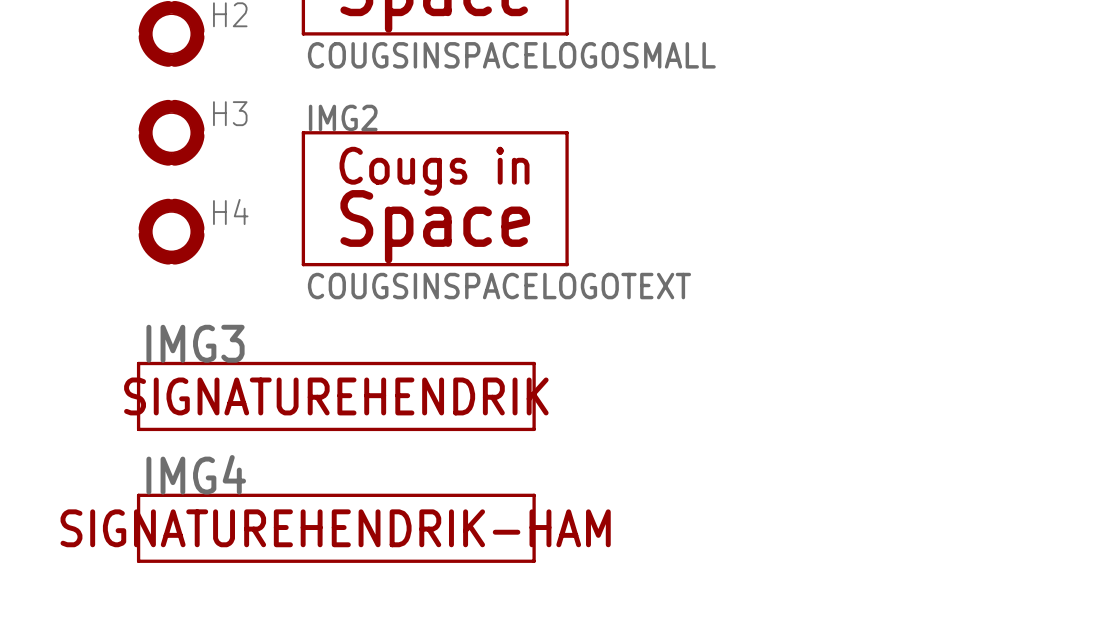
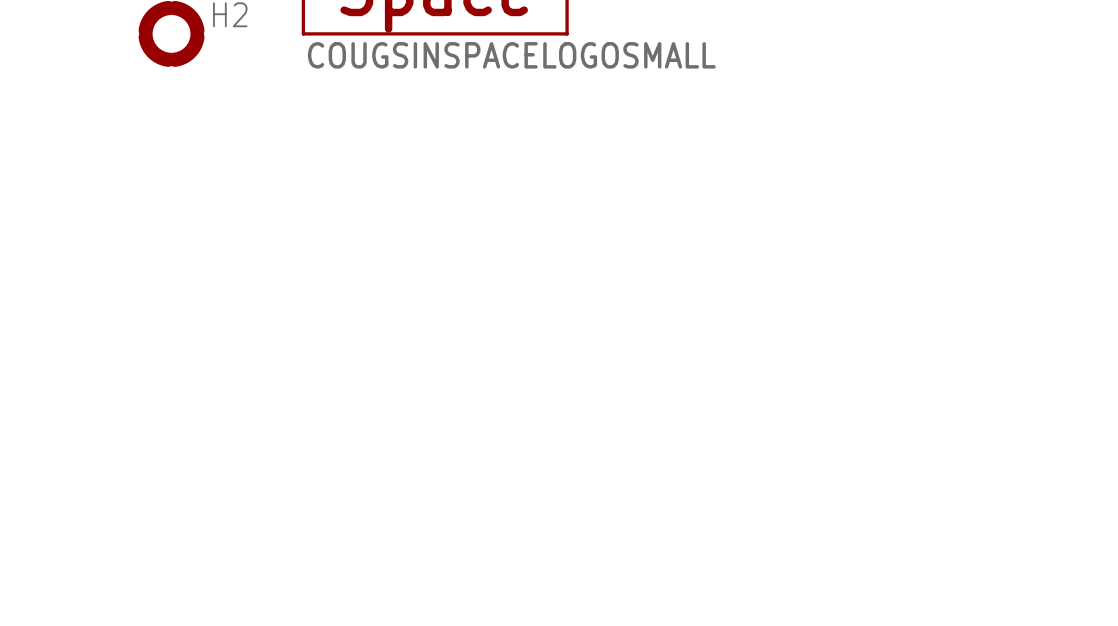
H3: (171, 132) -> none
IMG2: COUGSINSPACELOGOTEXT (435, 198) -> none
H4: (171, 231) -> none
IMG3: SIGNATUREHENDRIK (336, 396) -> none
IMG4: SIGNATUREHENDRIK-HAM (336, 528) -> none

